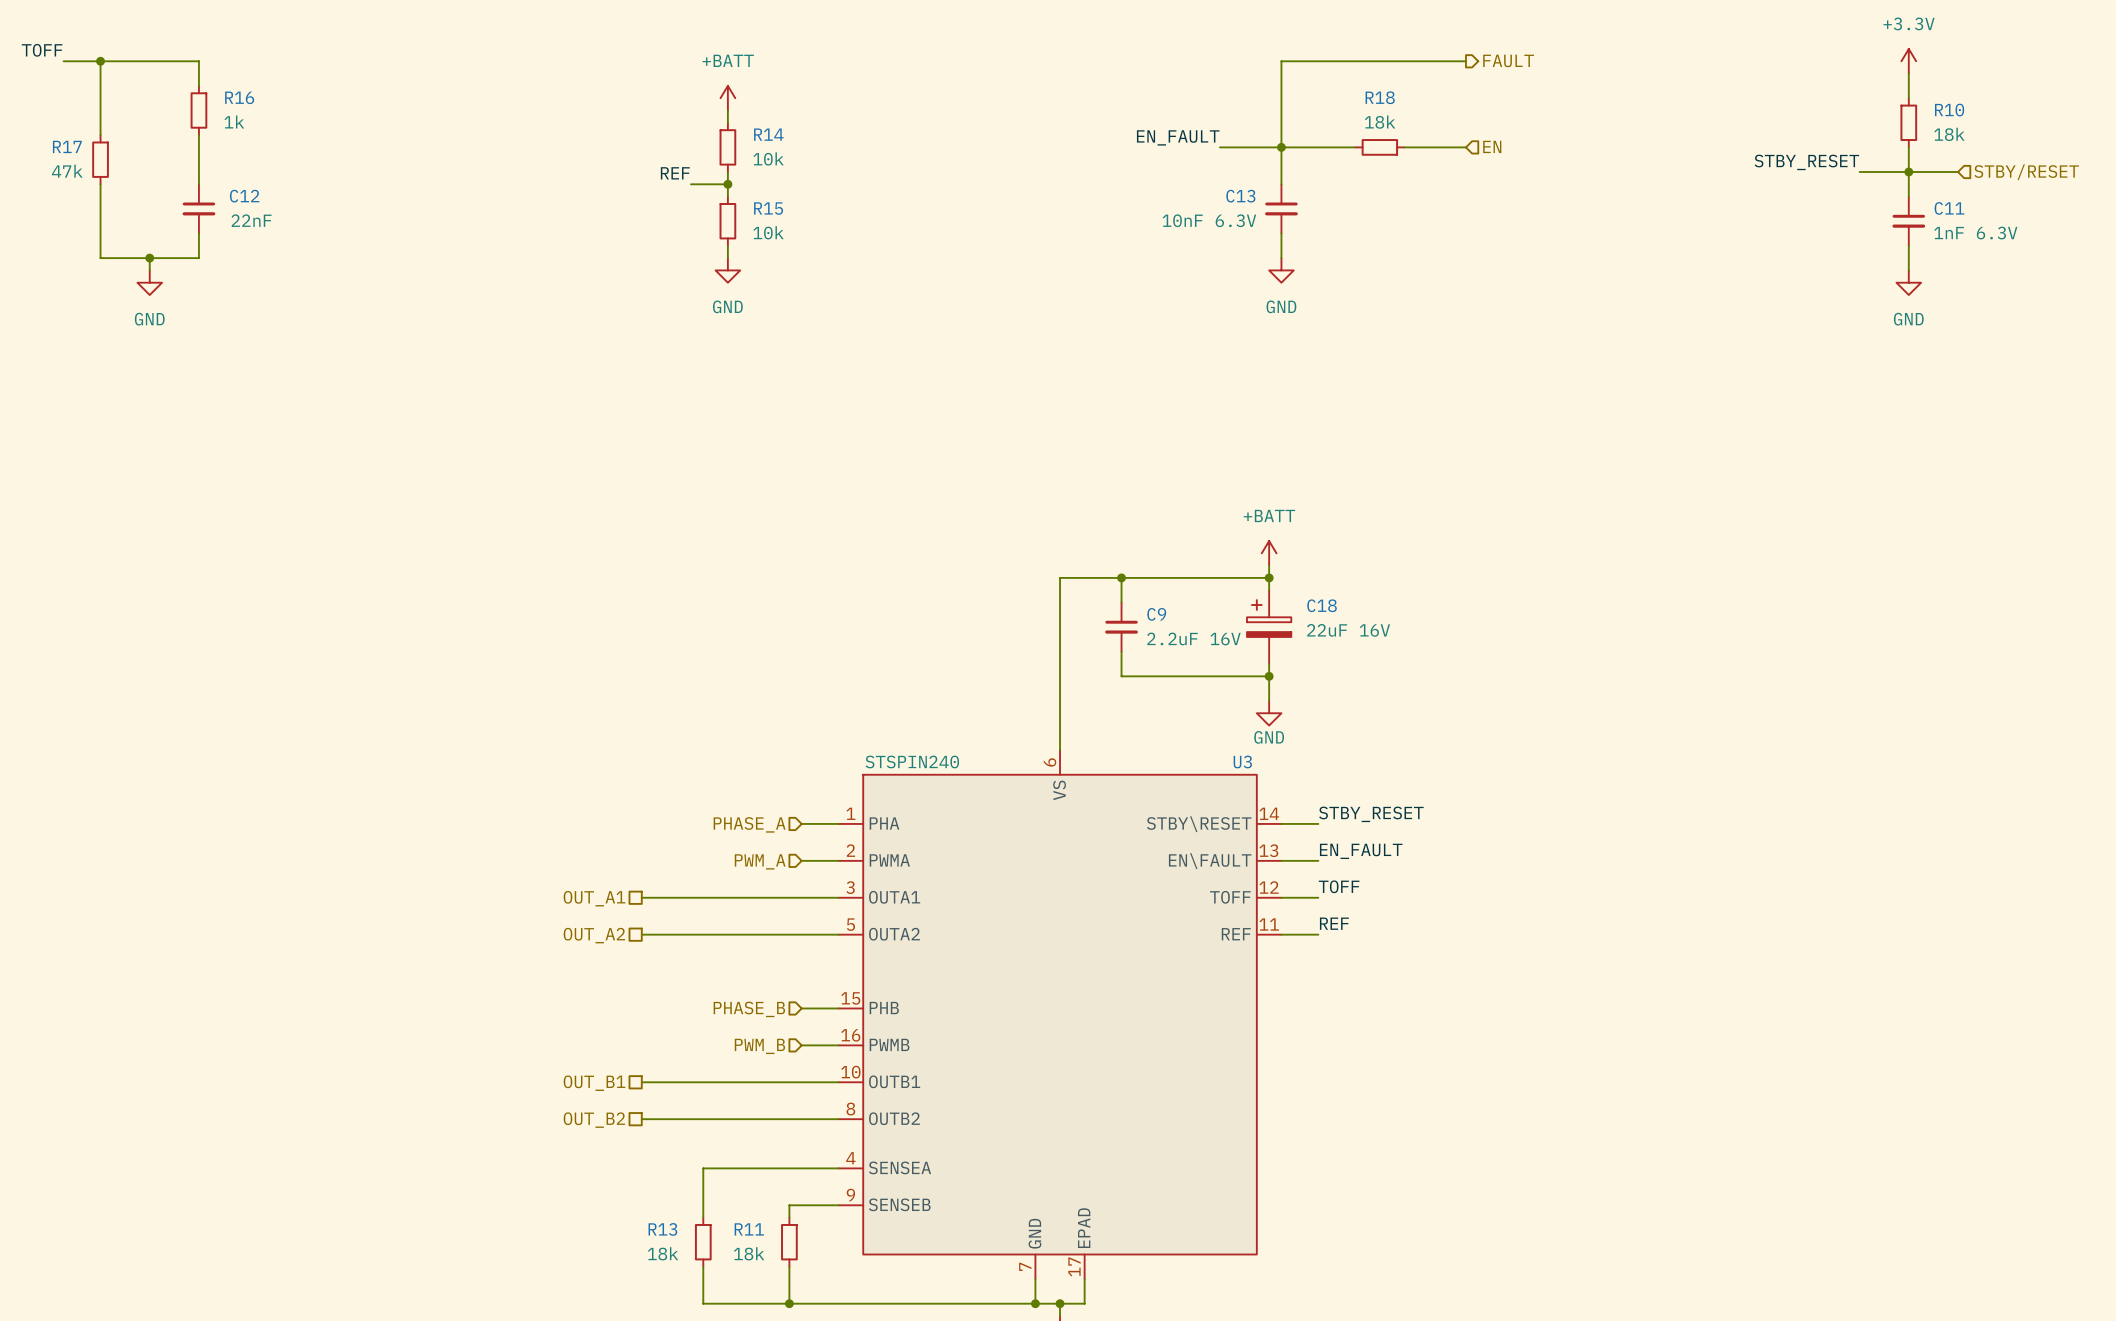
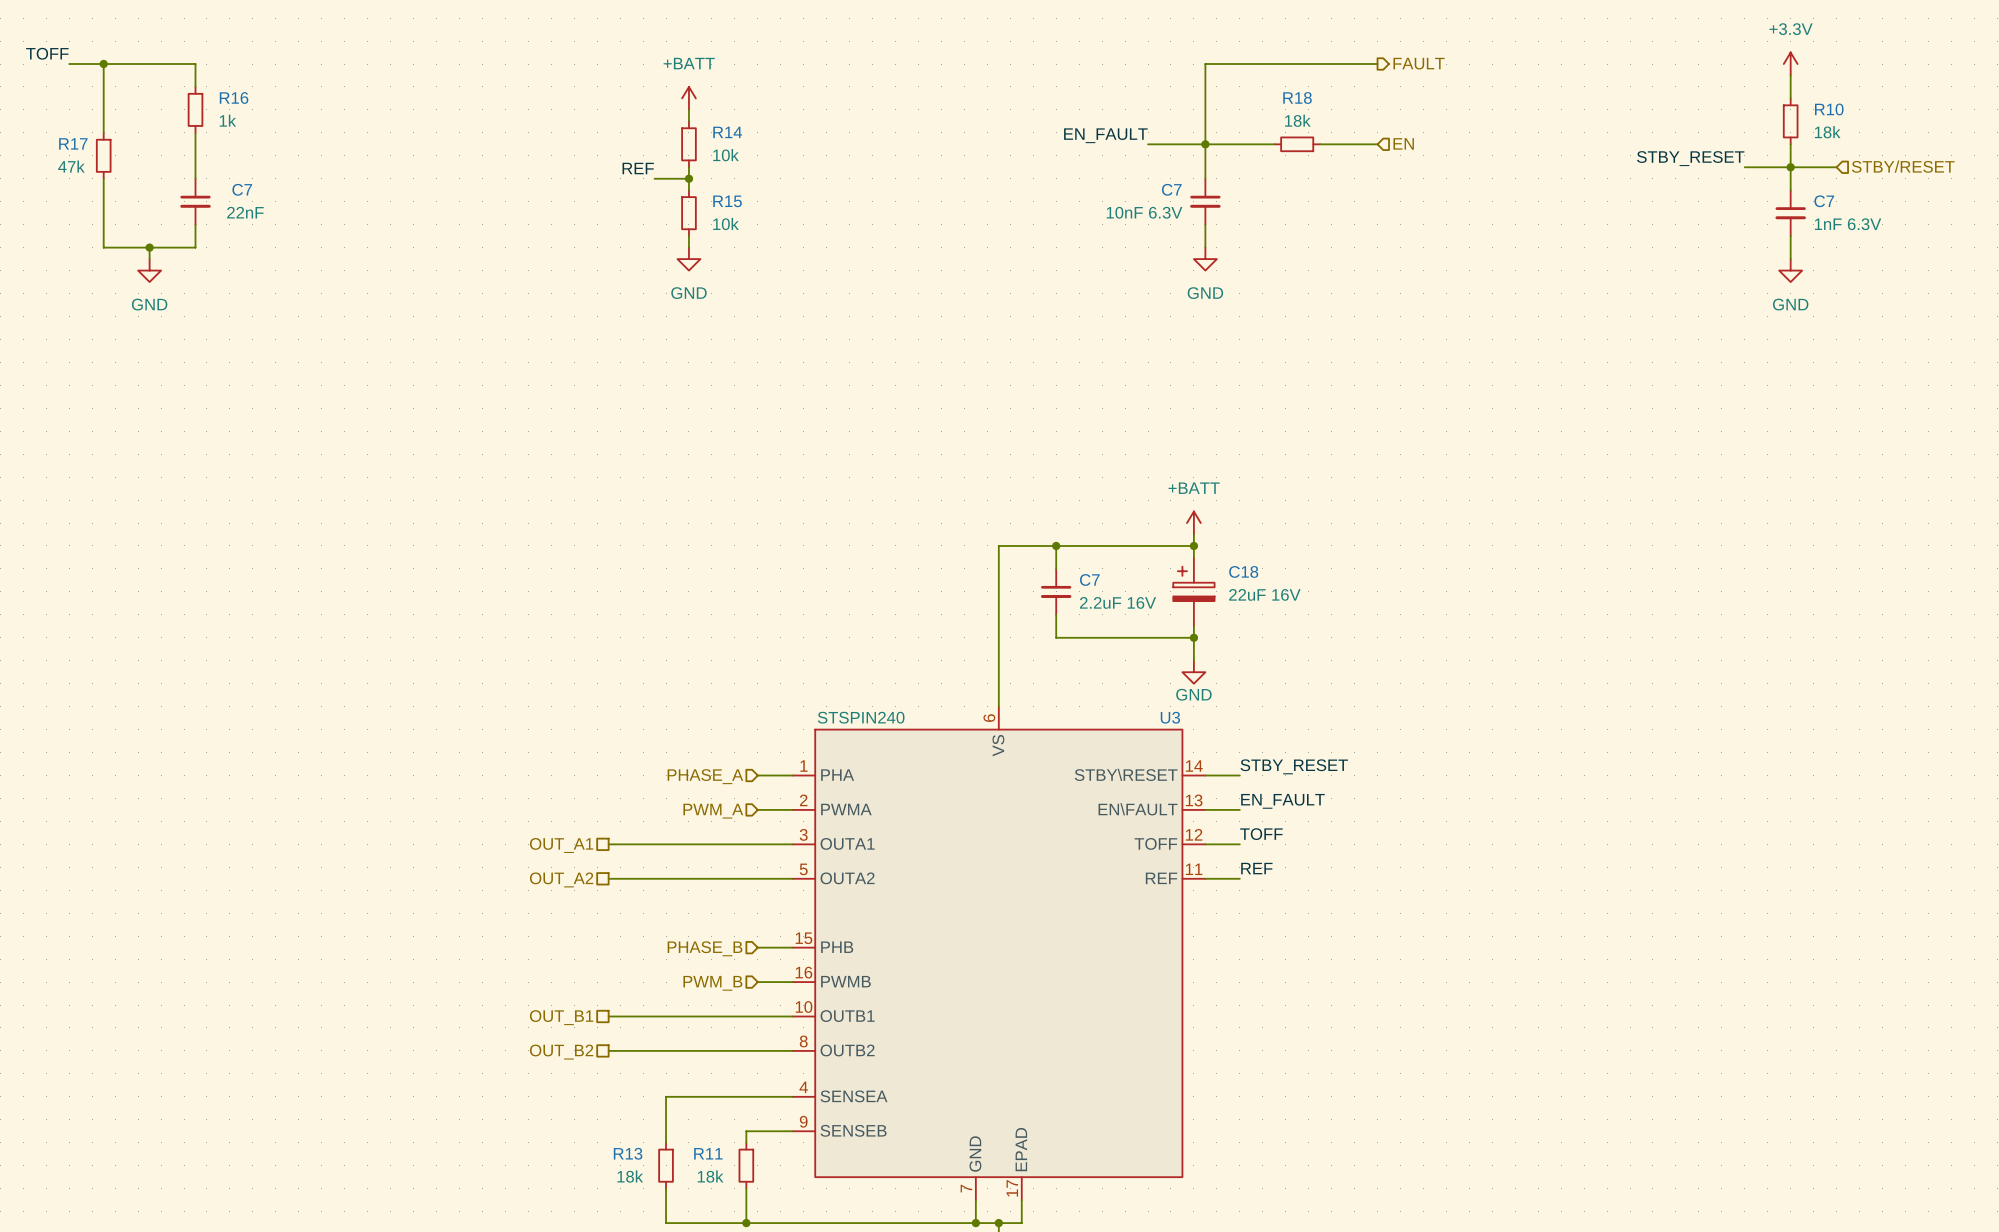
C12 name: C12 (244, 196) -> C7 (242, 189)
C13 name: C13 (1240, 196) -> C7 (1171, 189)
C11 name: C11 (1949, 208) -> C7 (1824, 201)
C9 name: C9 (1156, 614) -> C7 (1089, 579)

